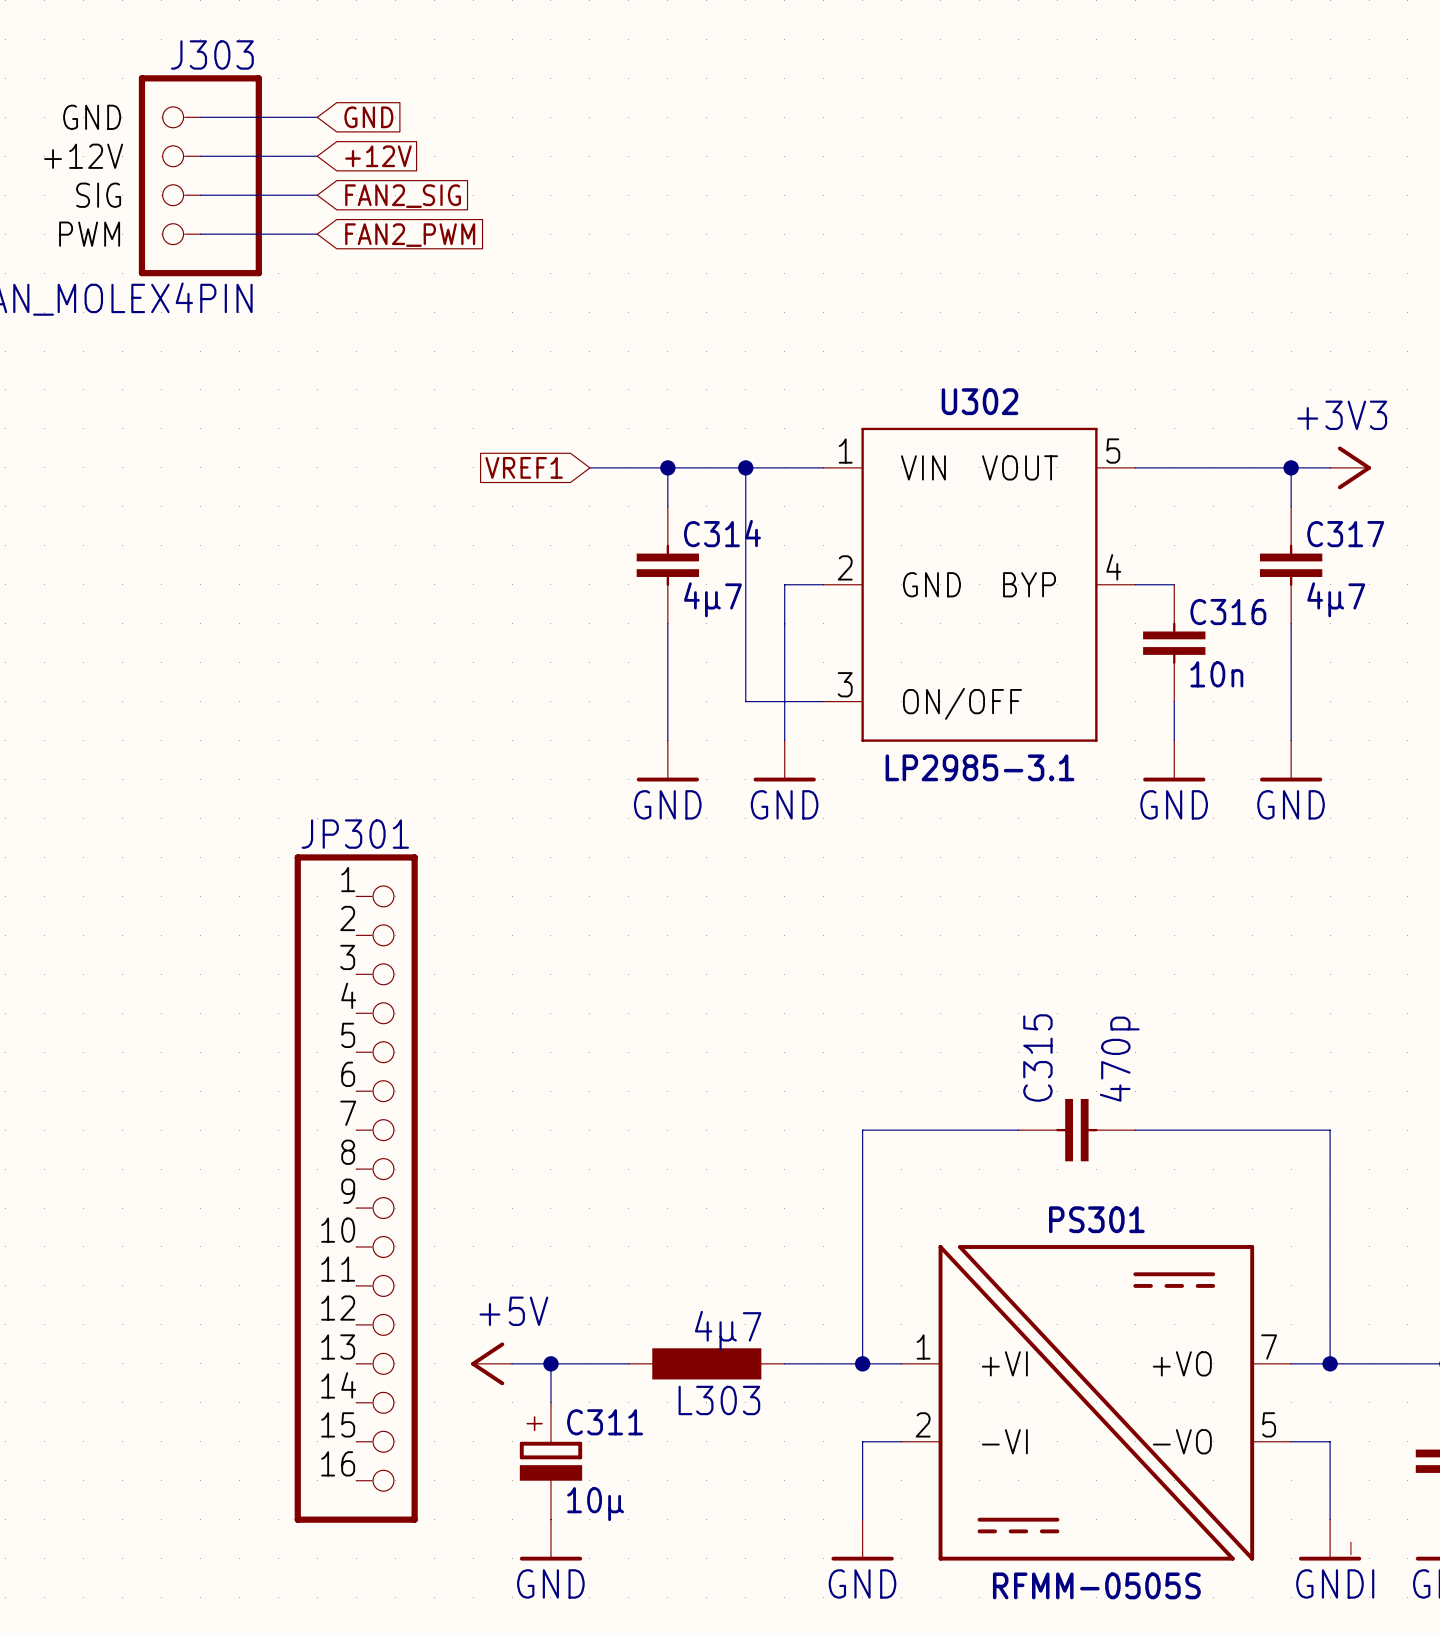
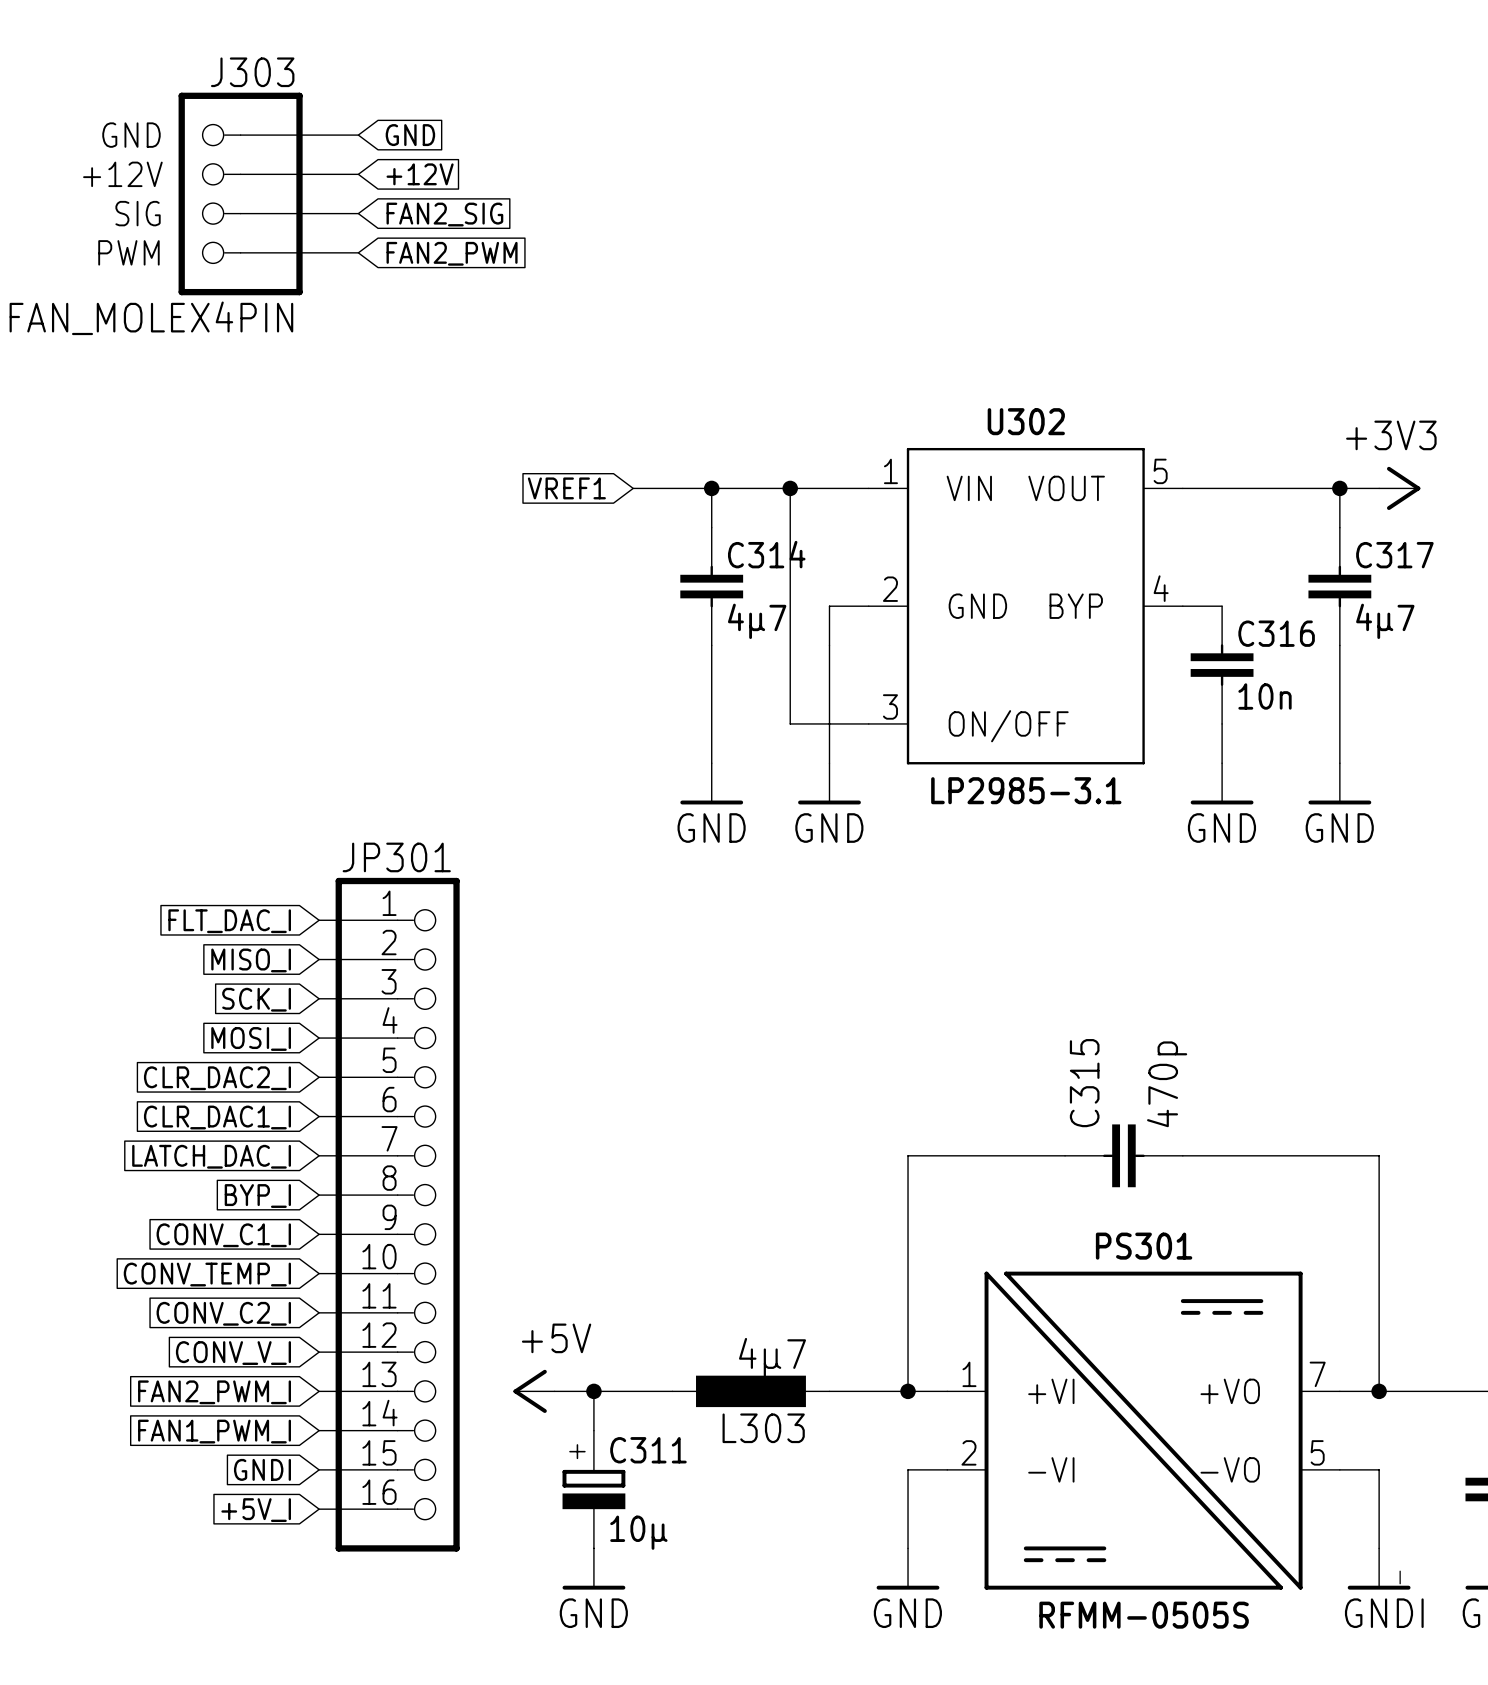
wire: none -> (319, 920) (397, 920)
global label: none -> FLT_DAC_I (229, 921)
wire: none -> (319, 959) (397, 959)
global label: none -> MISO_I (251, 960)
wire: none -> (319, 998) (397, 998)
global label: none -> SCK_I (256, 999)
wire: none -> (319, 1038) (397, 1038)
global label: none -> MOSI_I (251, 1038)
wire: none -> (319, 1077) (397, 1077)
global label: none -> CLR_DAC2_I (217, 1078)
wire: none -> (319, 1116) (397, 1116)
global label: none -> CLR_DAC1_I (217, 1117)
wire: none -> (319, 1155) (397, 1155)
global label: none -> LATCH_DAC_I (211, 1156)
wire: none -> (319, 1195) (397, 1195)
global label: none -> BYP_I (257, 1196)
global label: none -> CONV_C1_I (223, 1235)
wire: none -> (319, 1234) (397, 1234)
wire: none -> (319, 1273) (397, 1273)
global label: none -> CONV_TEMP_I (207, 1274)
wire: none -> (319, 1312) (397, 1312)
global label: none -> CONV_C2_I (223, 1313)
wire: none -> (319, 1352) (397, 1352)
global label: none -> CONV_V_I (233, 1353)
wire: none -> (319, 1391) (397, 1391)
global label: none -> FAN2_PWM_I (214, 1392)
wire: none -> (319, 1430) (397, 1430)
global label: none -> FAN1_PWM_I (214, 1431)
global label: none -> GNDI (262, 1469)
wire: none -> (319, 1469) (397, 1469)
wire: none -> (319, 1509) (397, 1509)
global label: none -> +5V_I (256, 1510)

